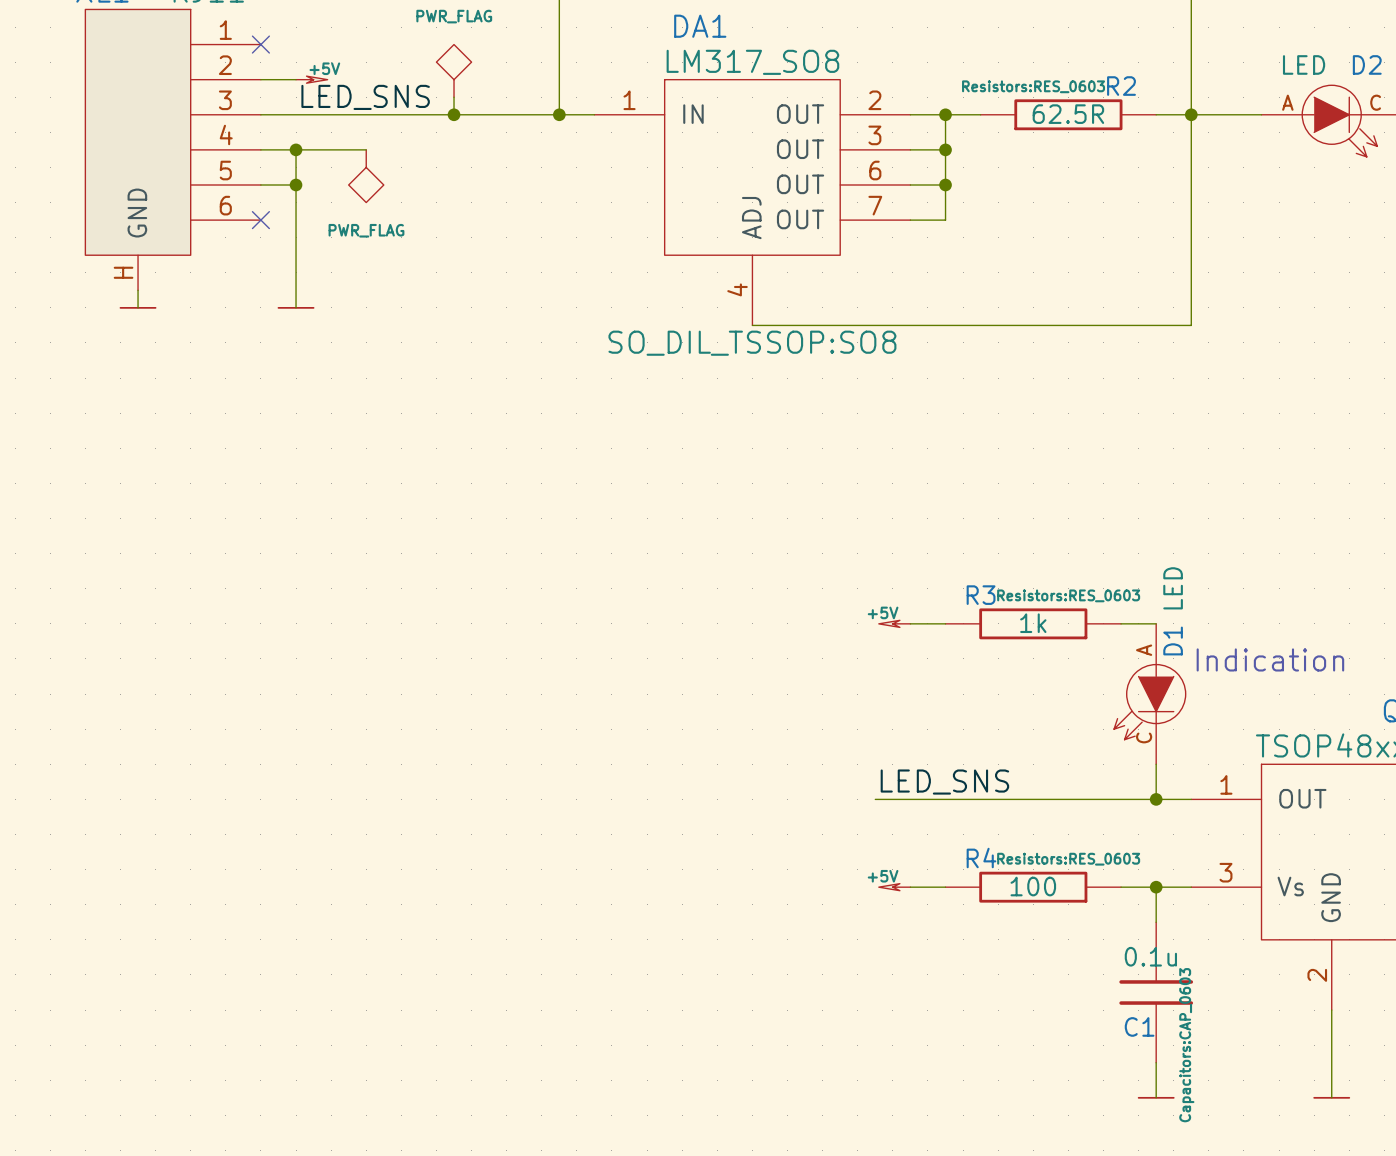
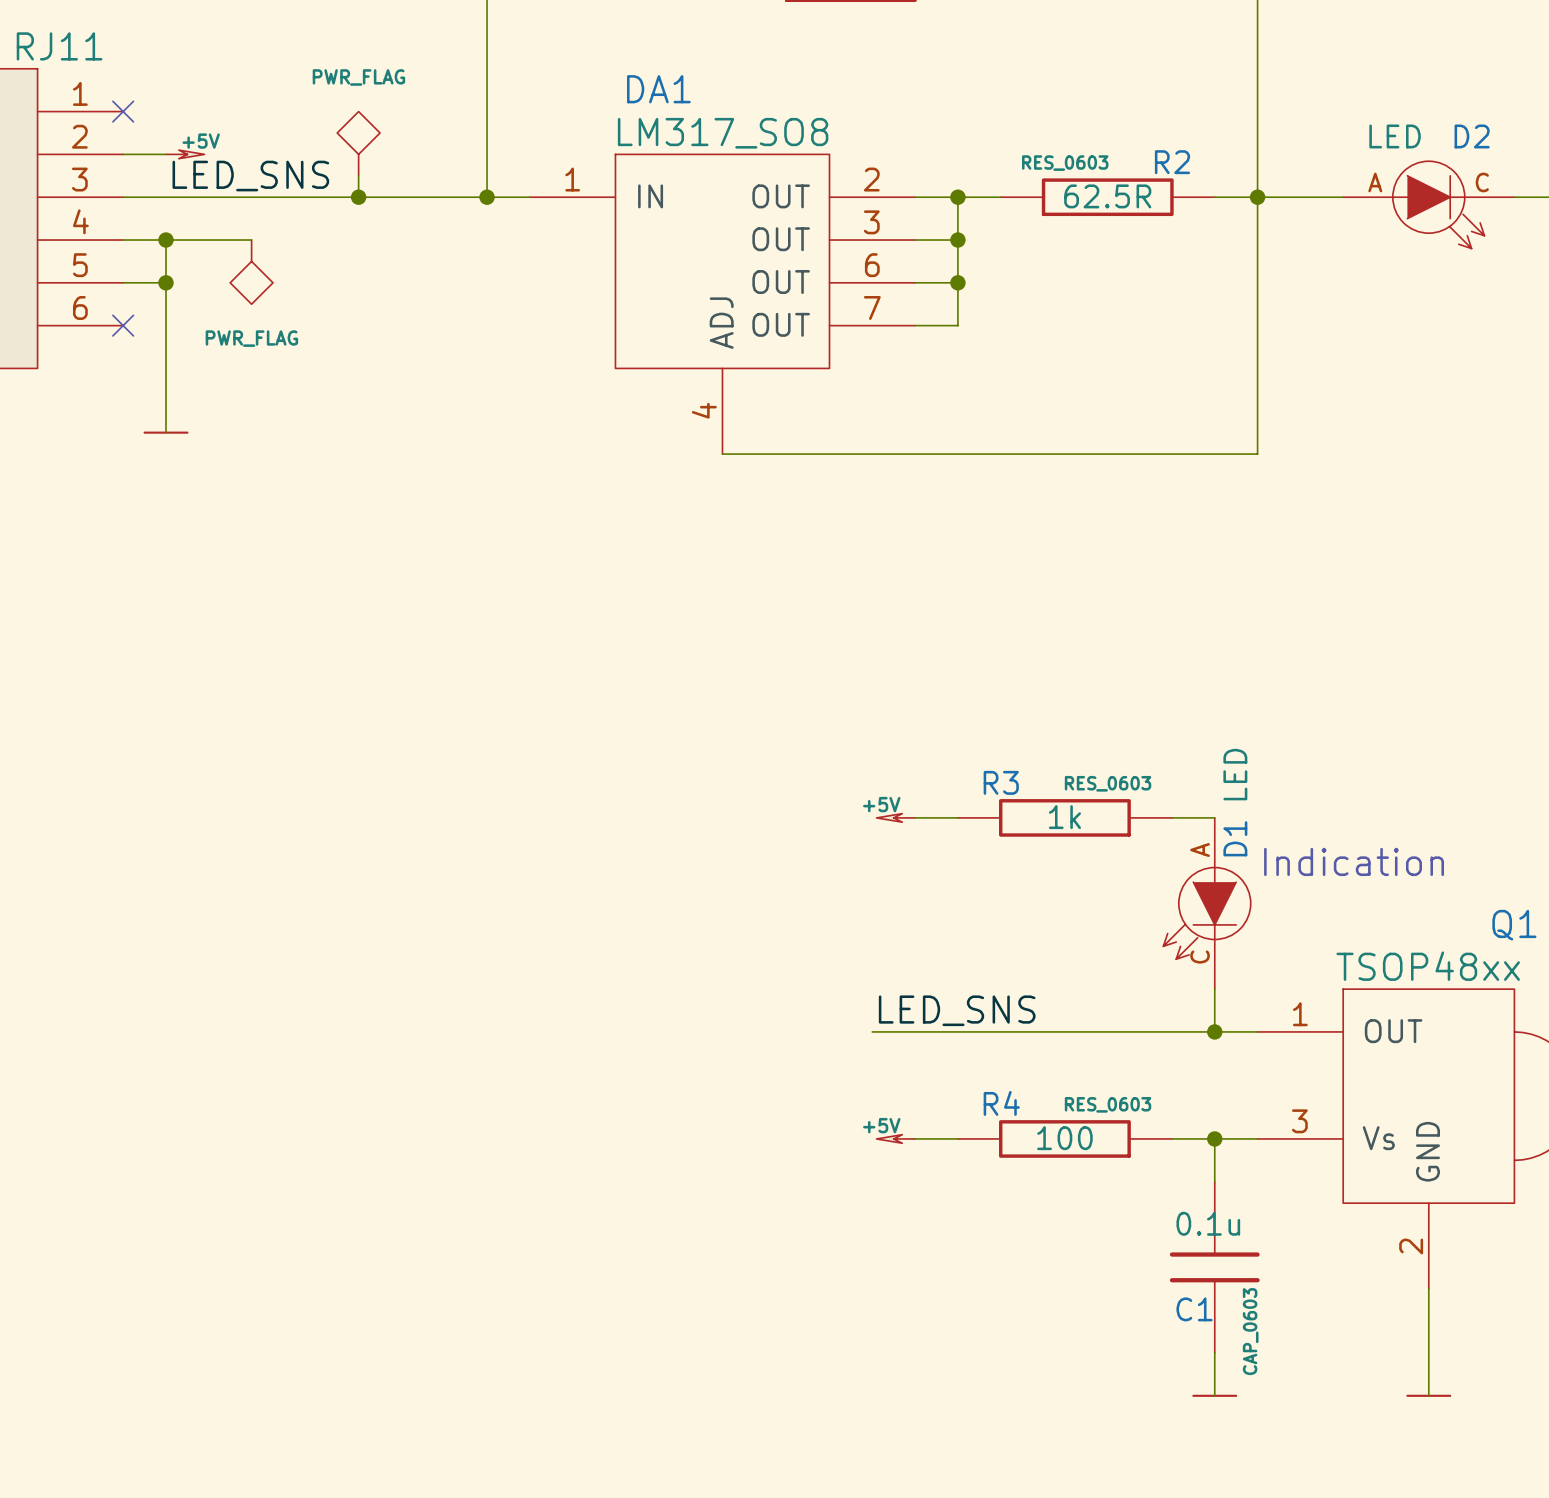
R2 text: Resistors:RES_0603 (1033, 86) -> RES_0603 (1065, 163)
DA1 text: SO_DIL_TSSOP:SO8 (752, 343) -> none
R3 text: Resistors:RES_0603 (1068, 595) -> RES_0603 (1108, 783)
R4 text: Resistors:RES_0603 (1068, 859) -> RES_0603 (1108, 1104)
C1 text: Capacitors:CAP_0603 (1186, 1045) -> CAP_0603 (1250, 1331)

